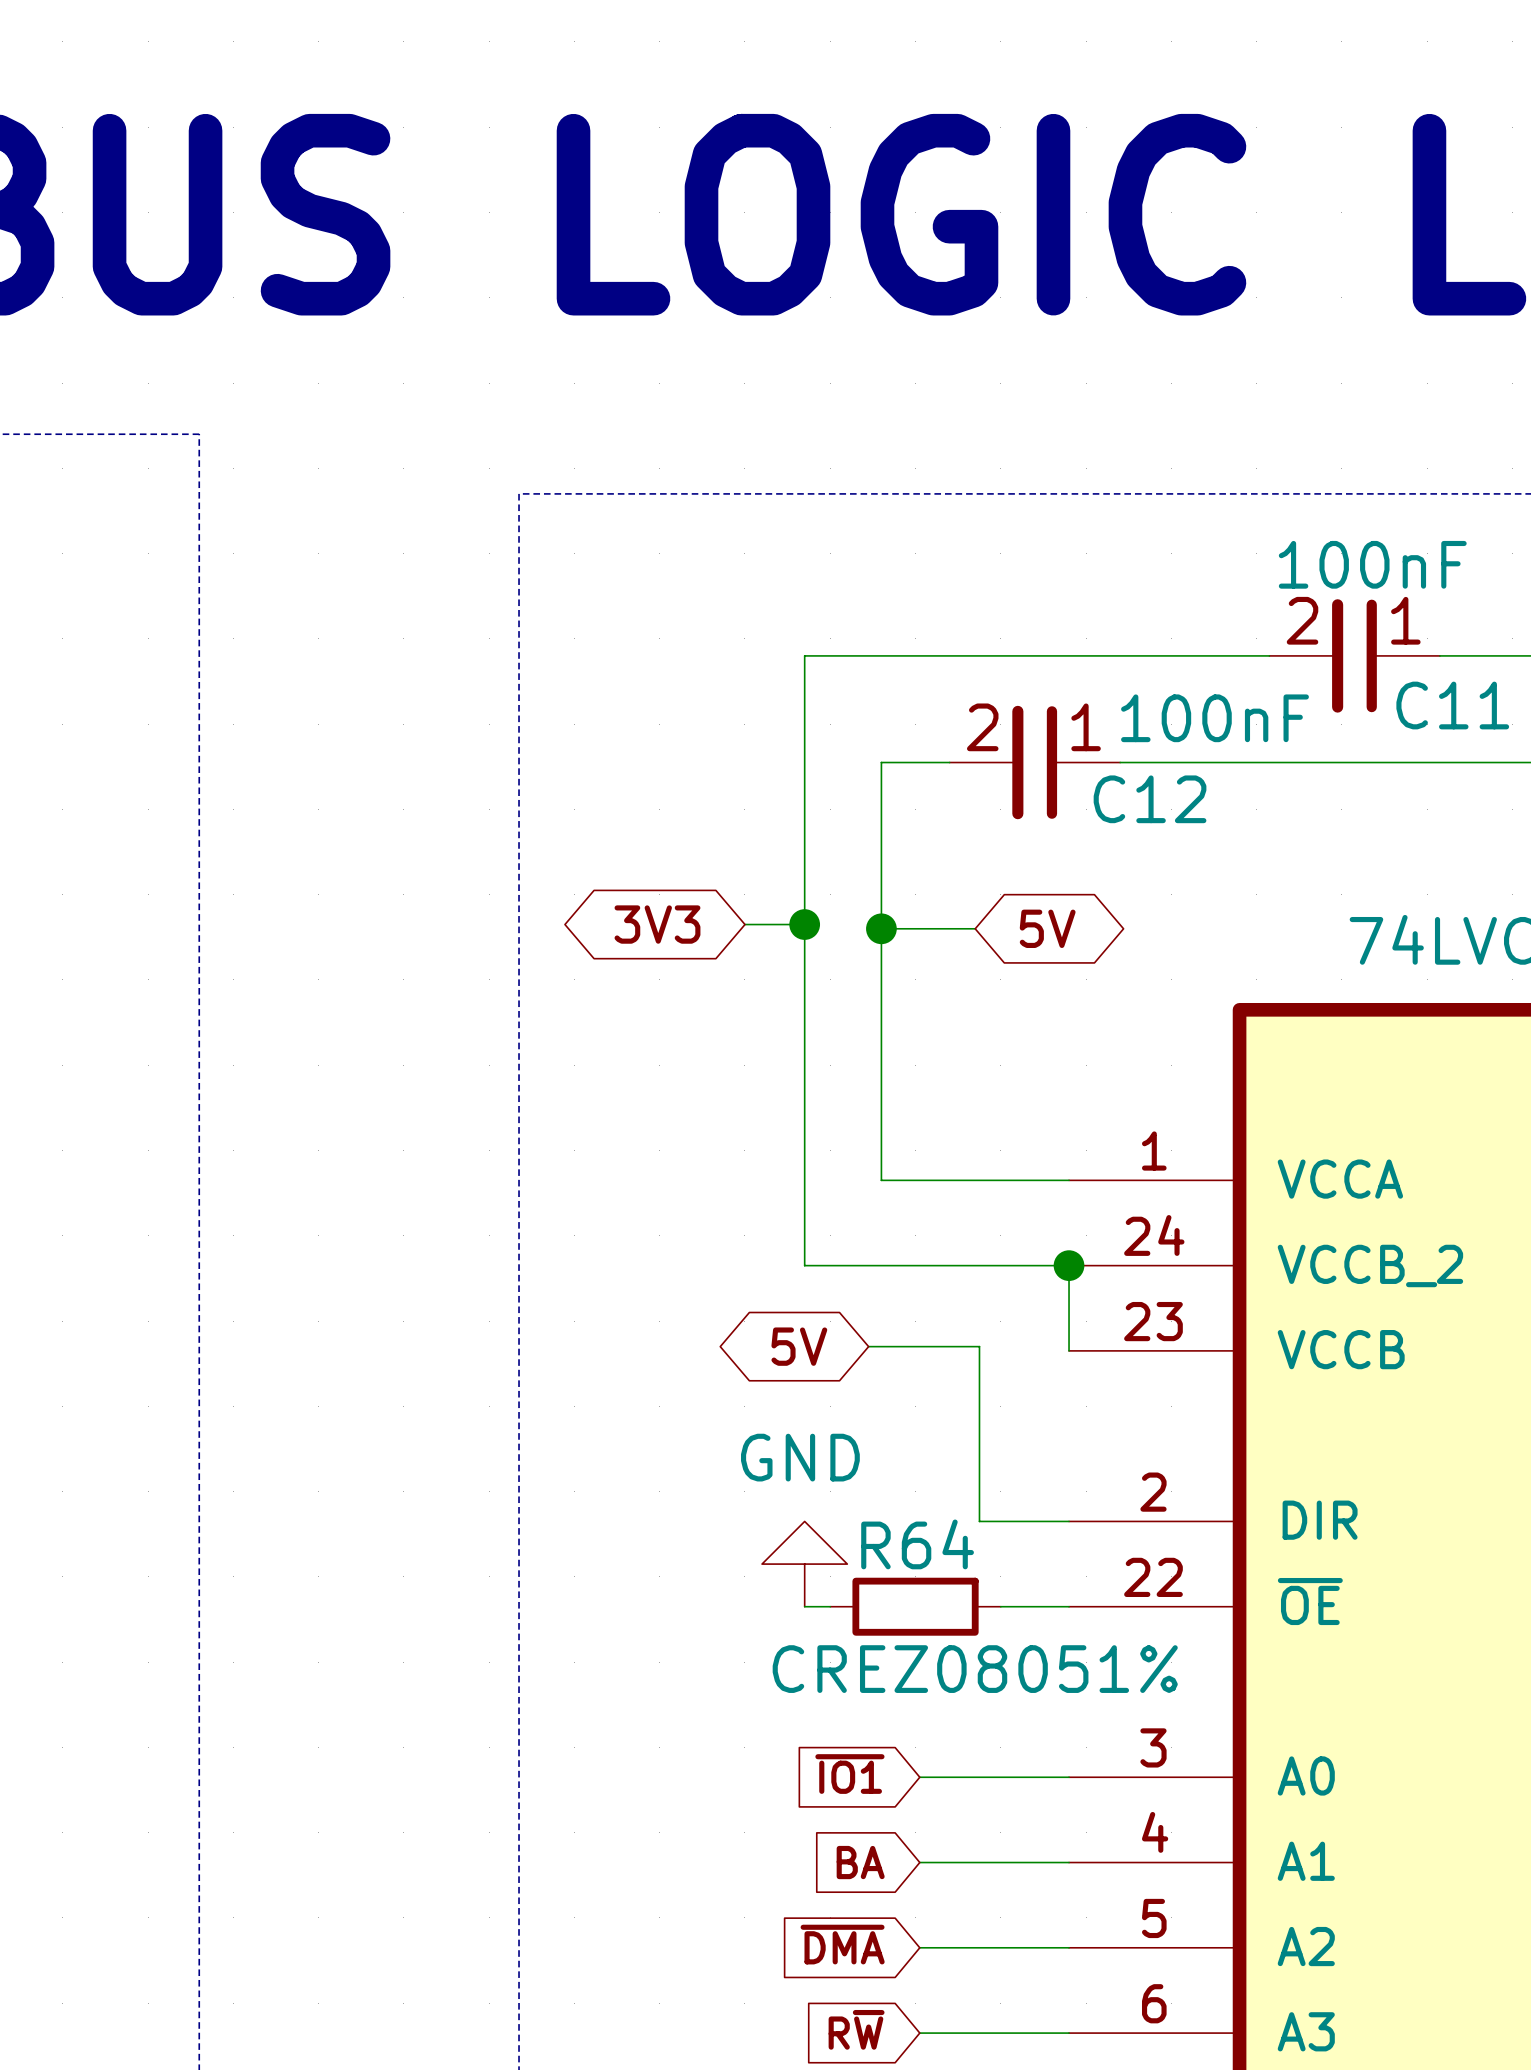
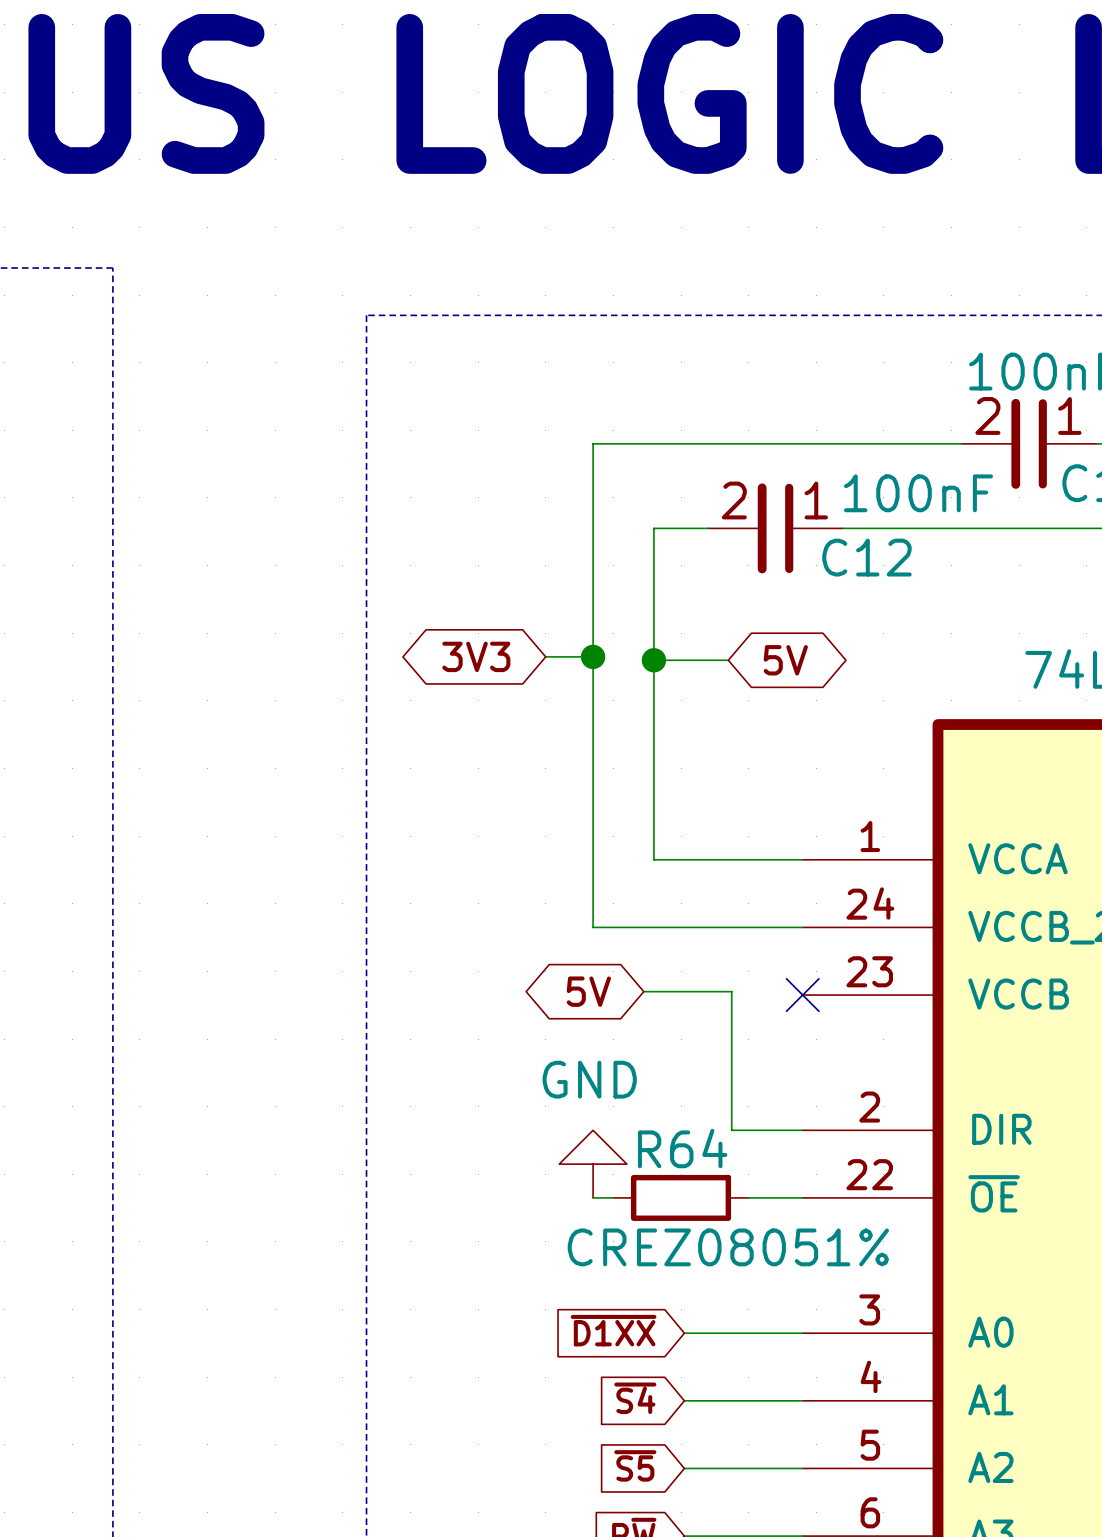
wire: (1069, 1265) (1069, 1350) -> none
junction: (1069, 1265) -> none
no-connect mark: none -> (802, 995)
global label: ~{IO1} (849, 1774) -> ~{D1XX} (613, 1330)
global label: BA (860, 1862) -> ~{S4} (635, 1398)
global label: ~{DMA} (842, 1944) -> ~{S5} (635, 1465)

